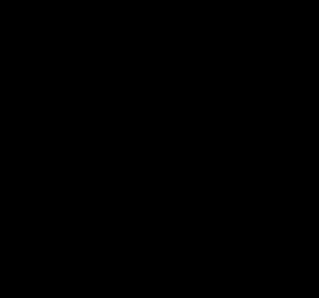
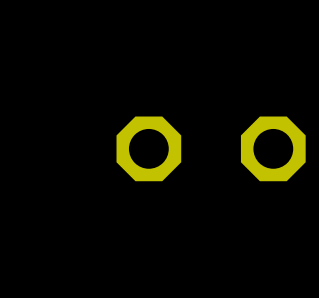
part: none -> (211, 148)

